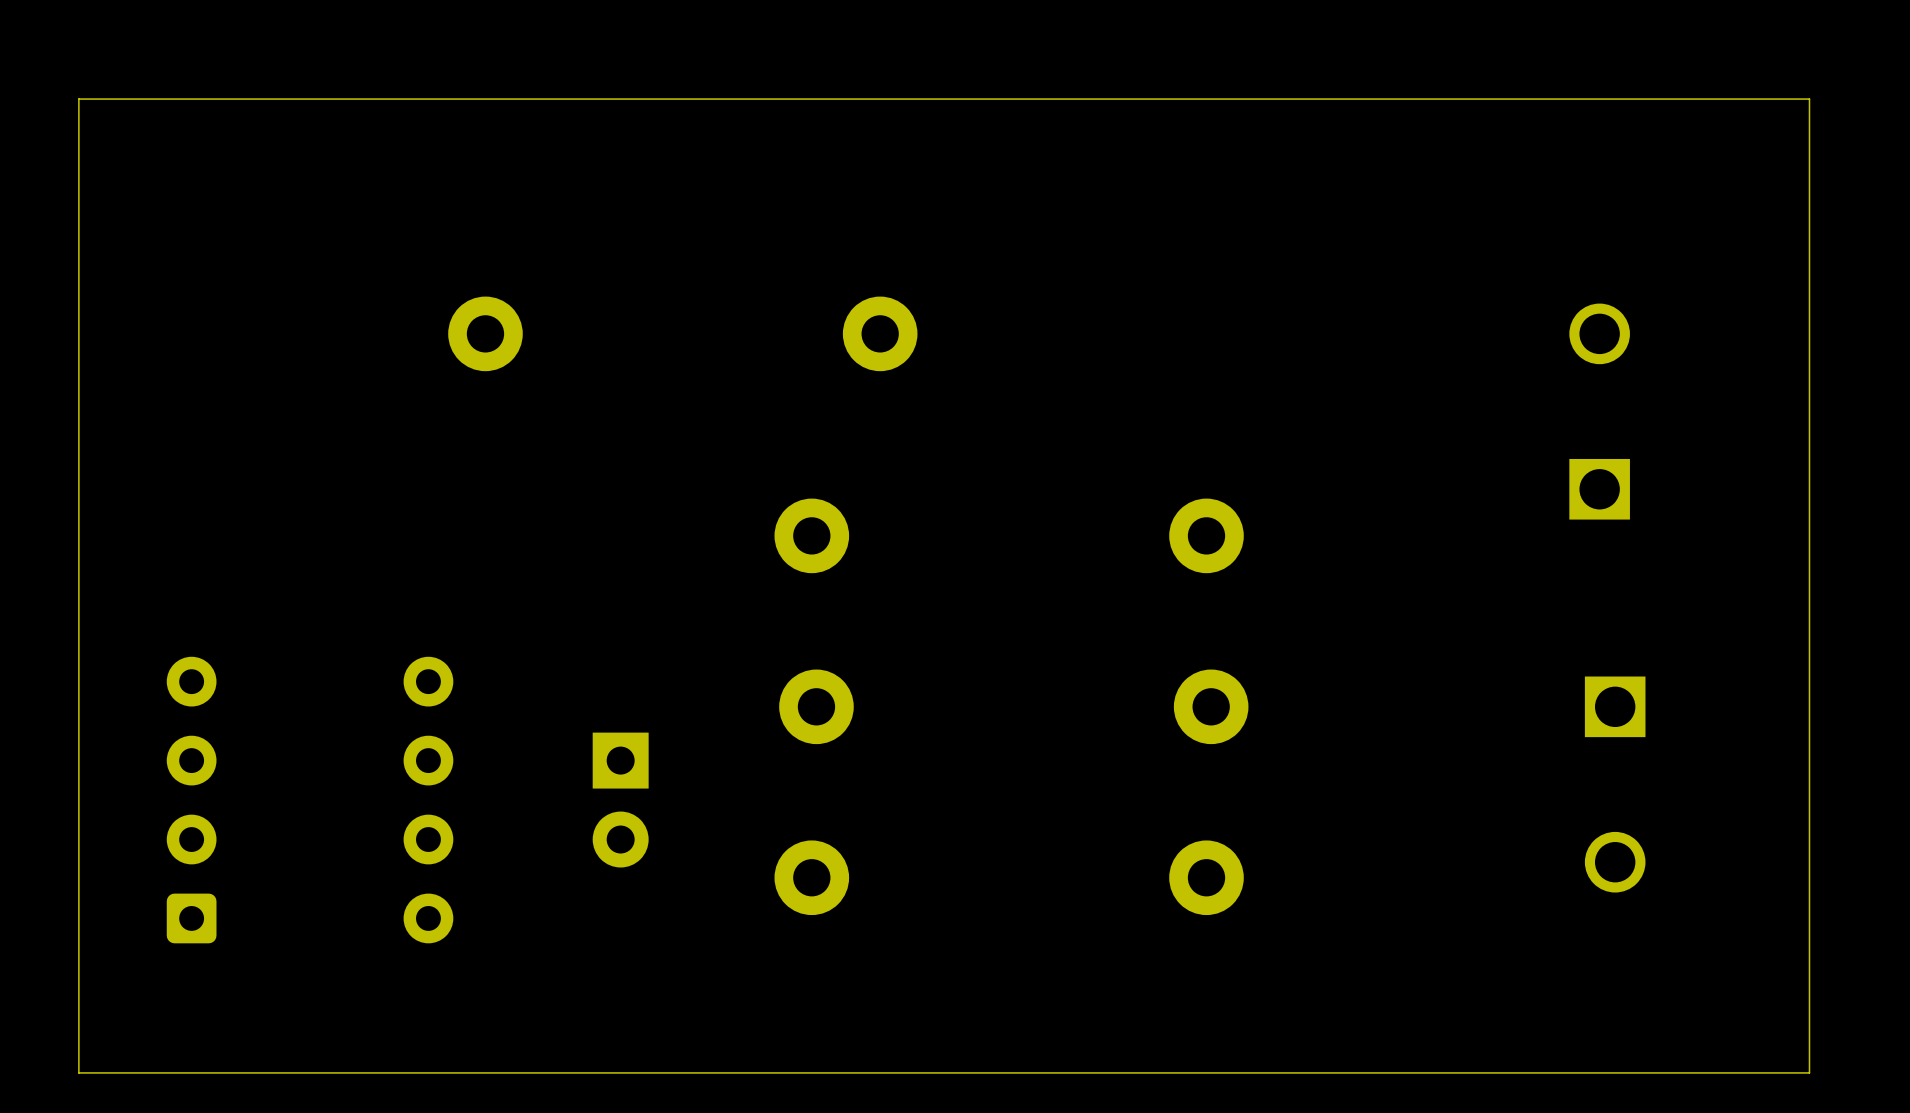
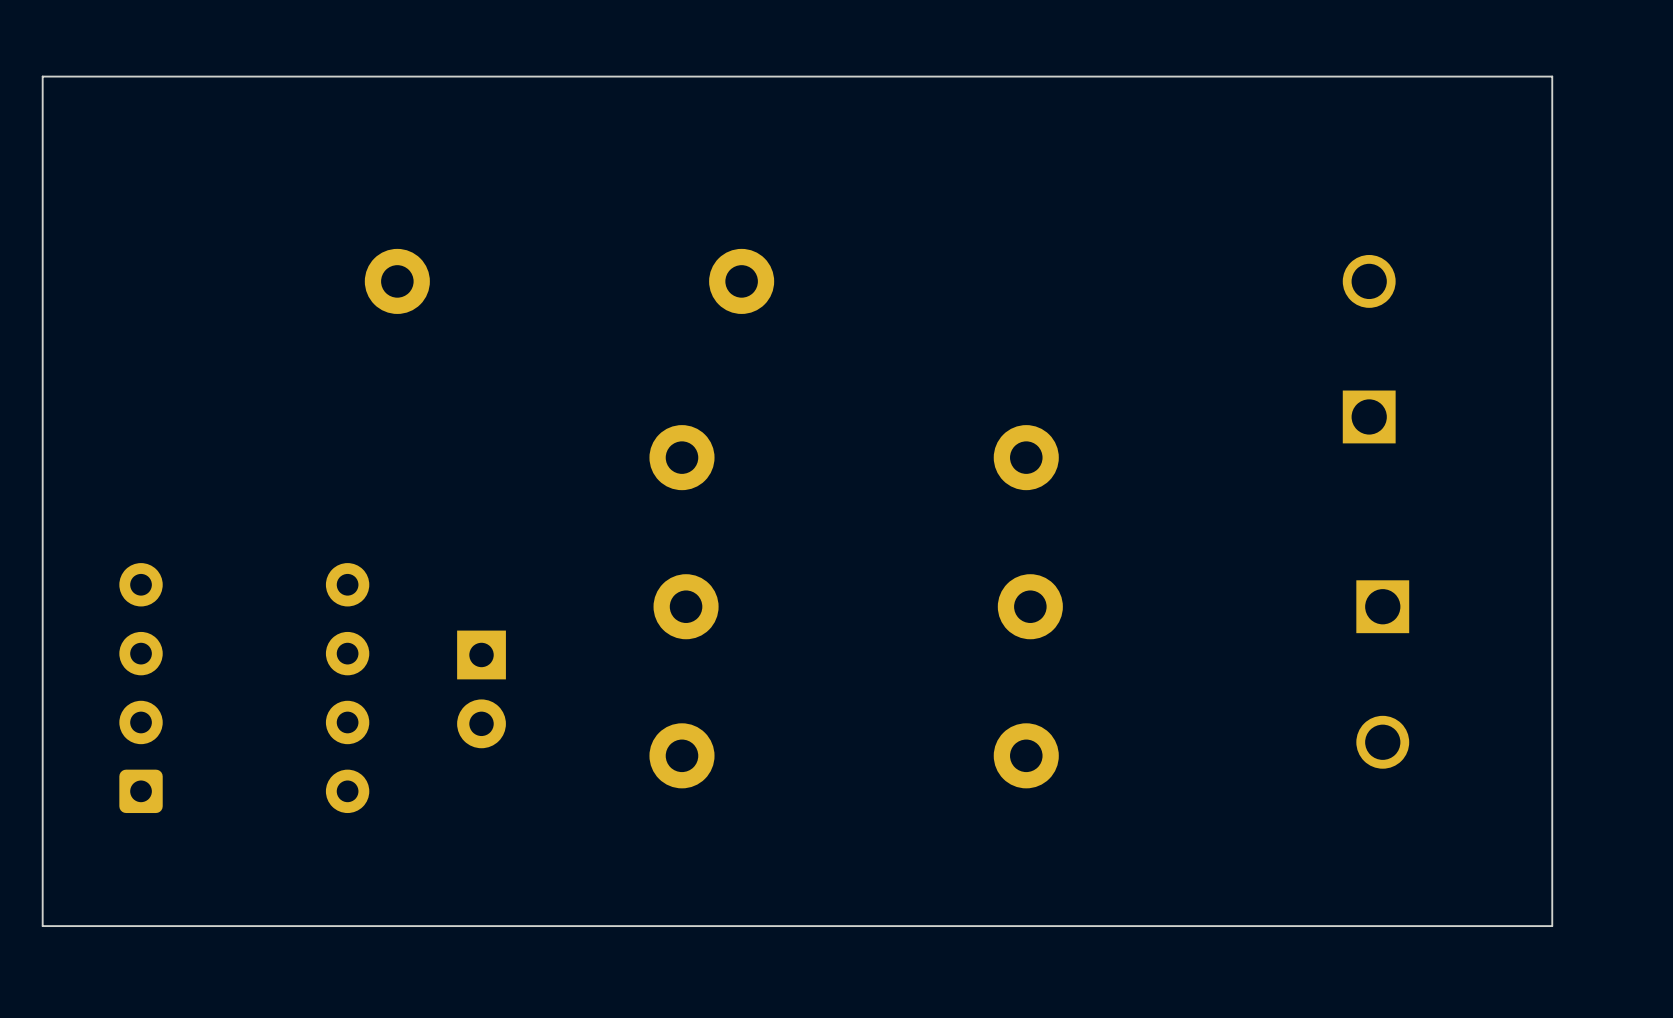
part position: (620, 800) -> (481, 689)

